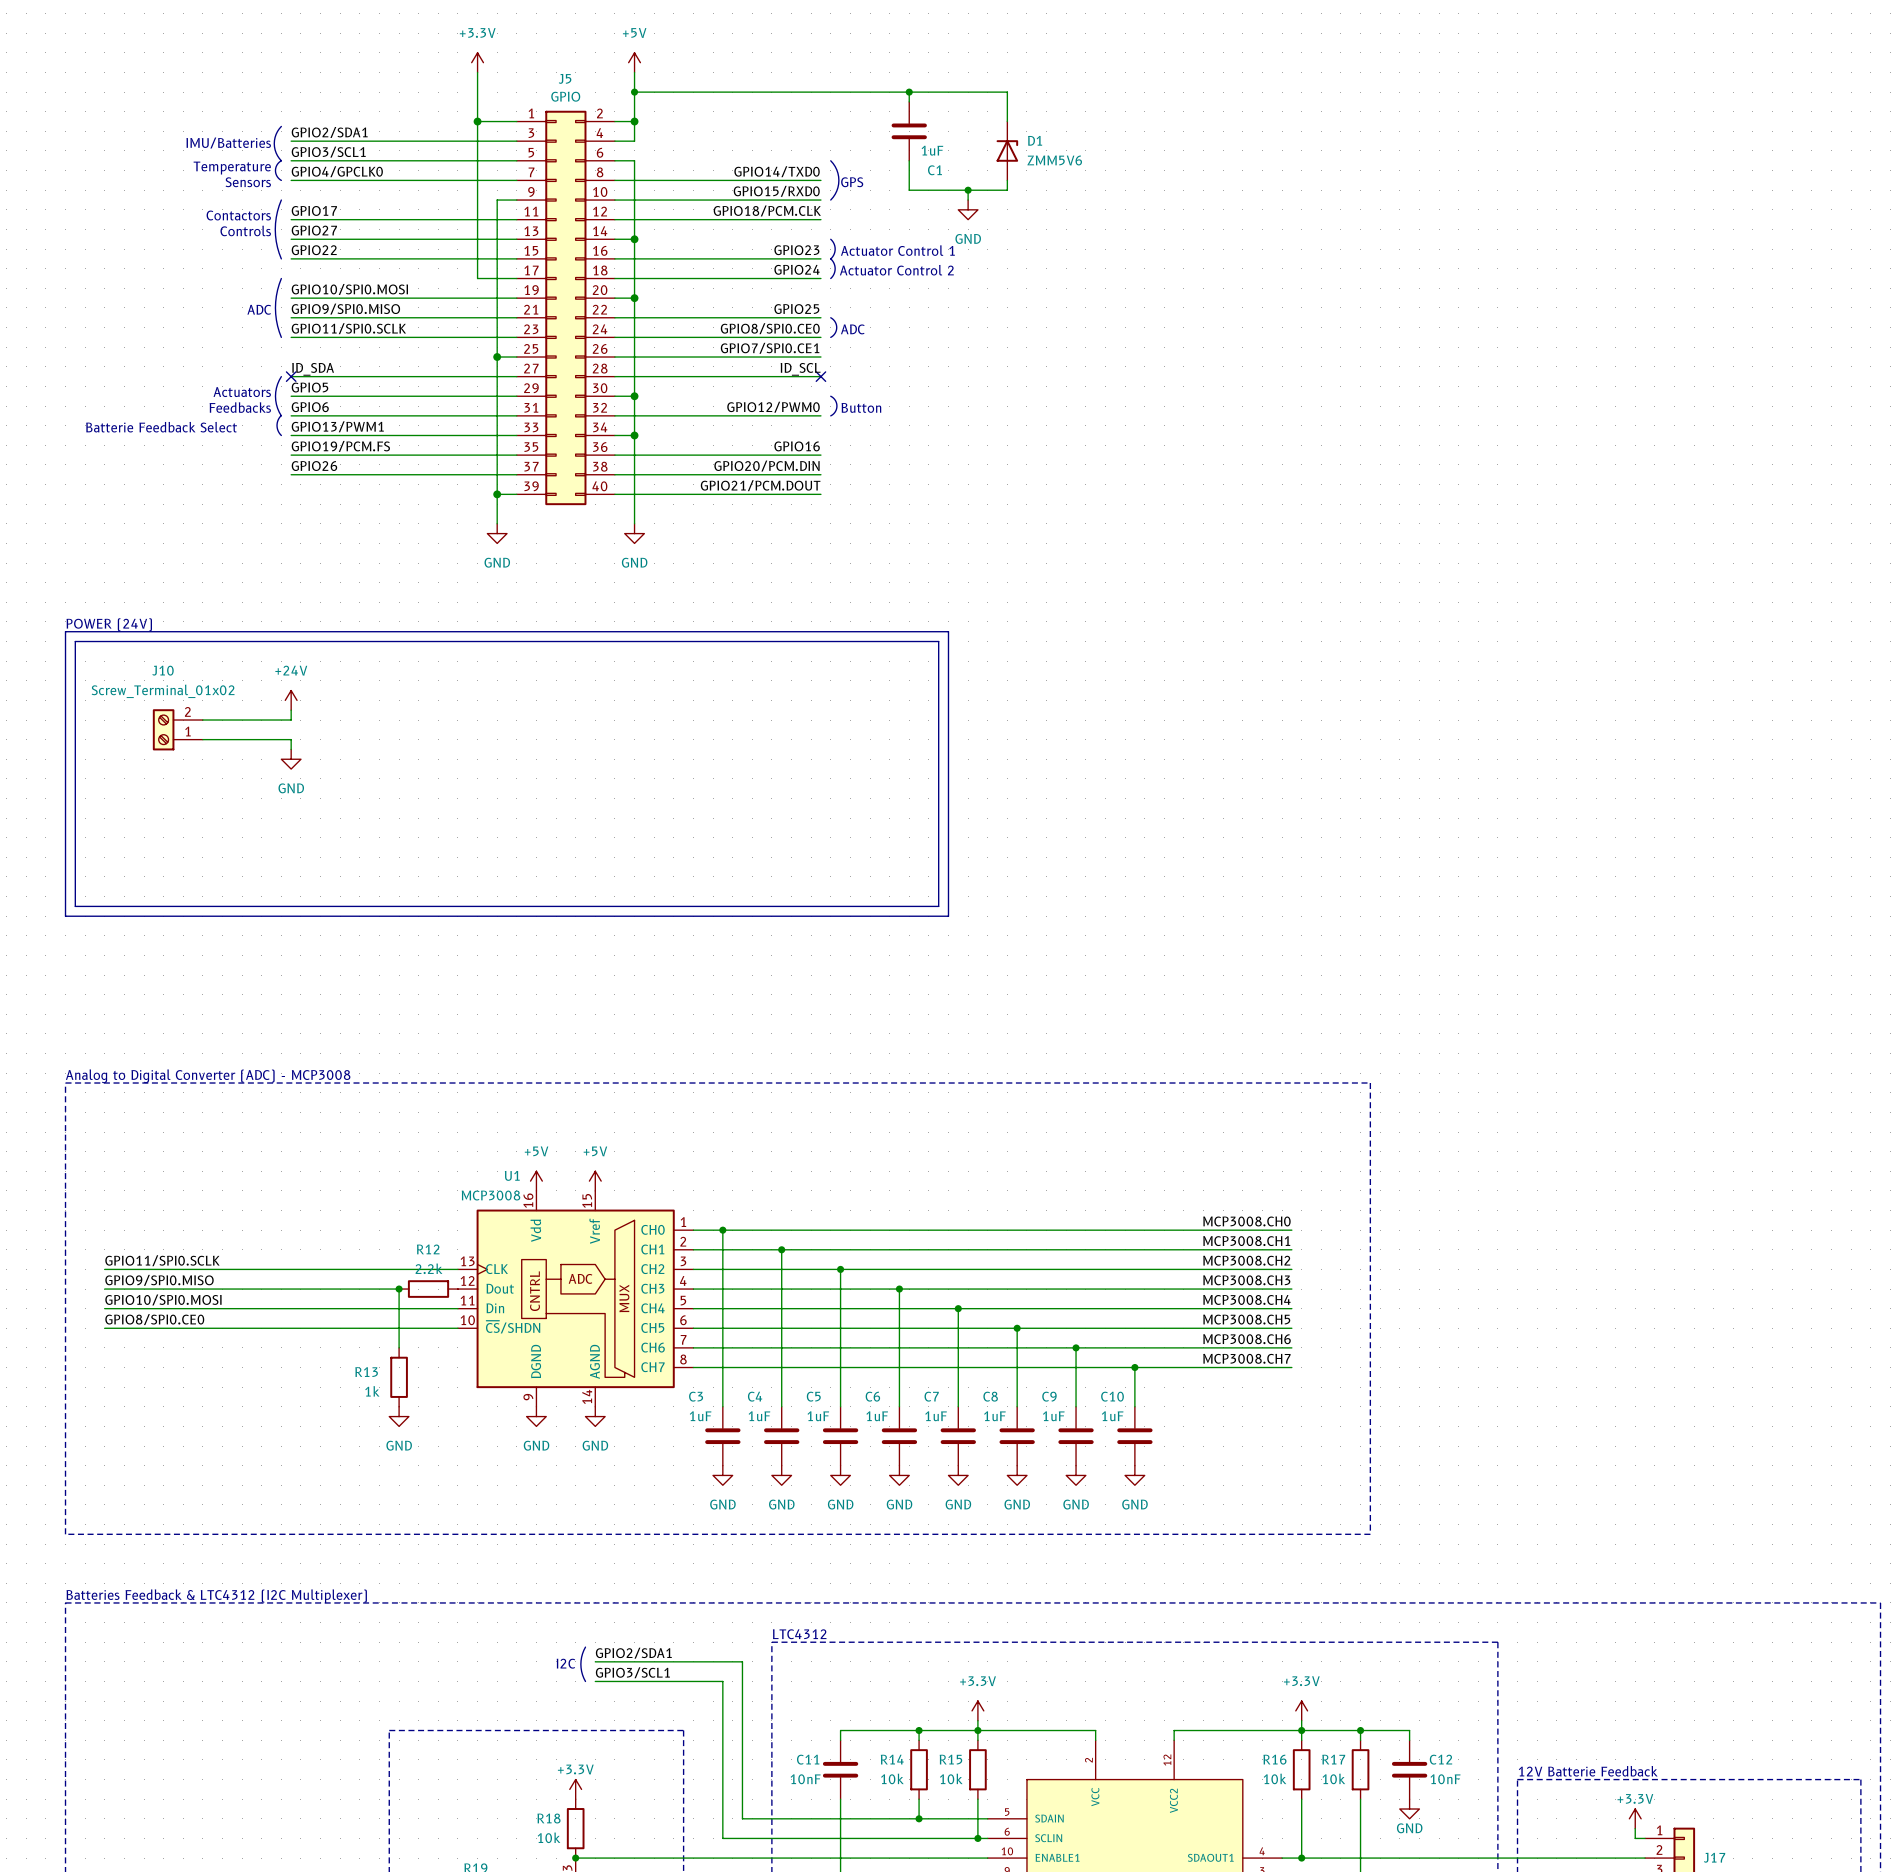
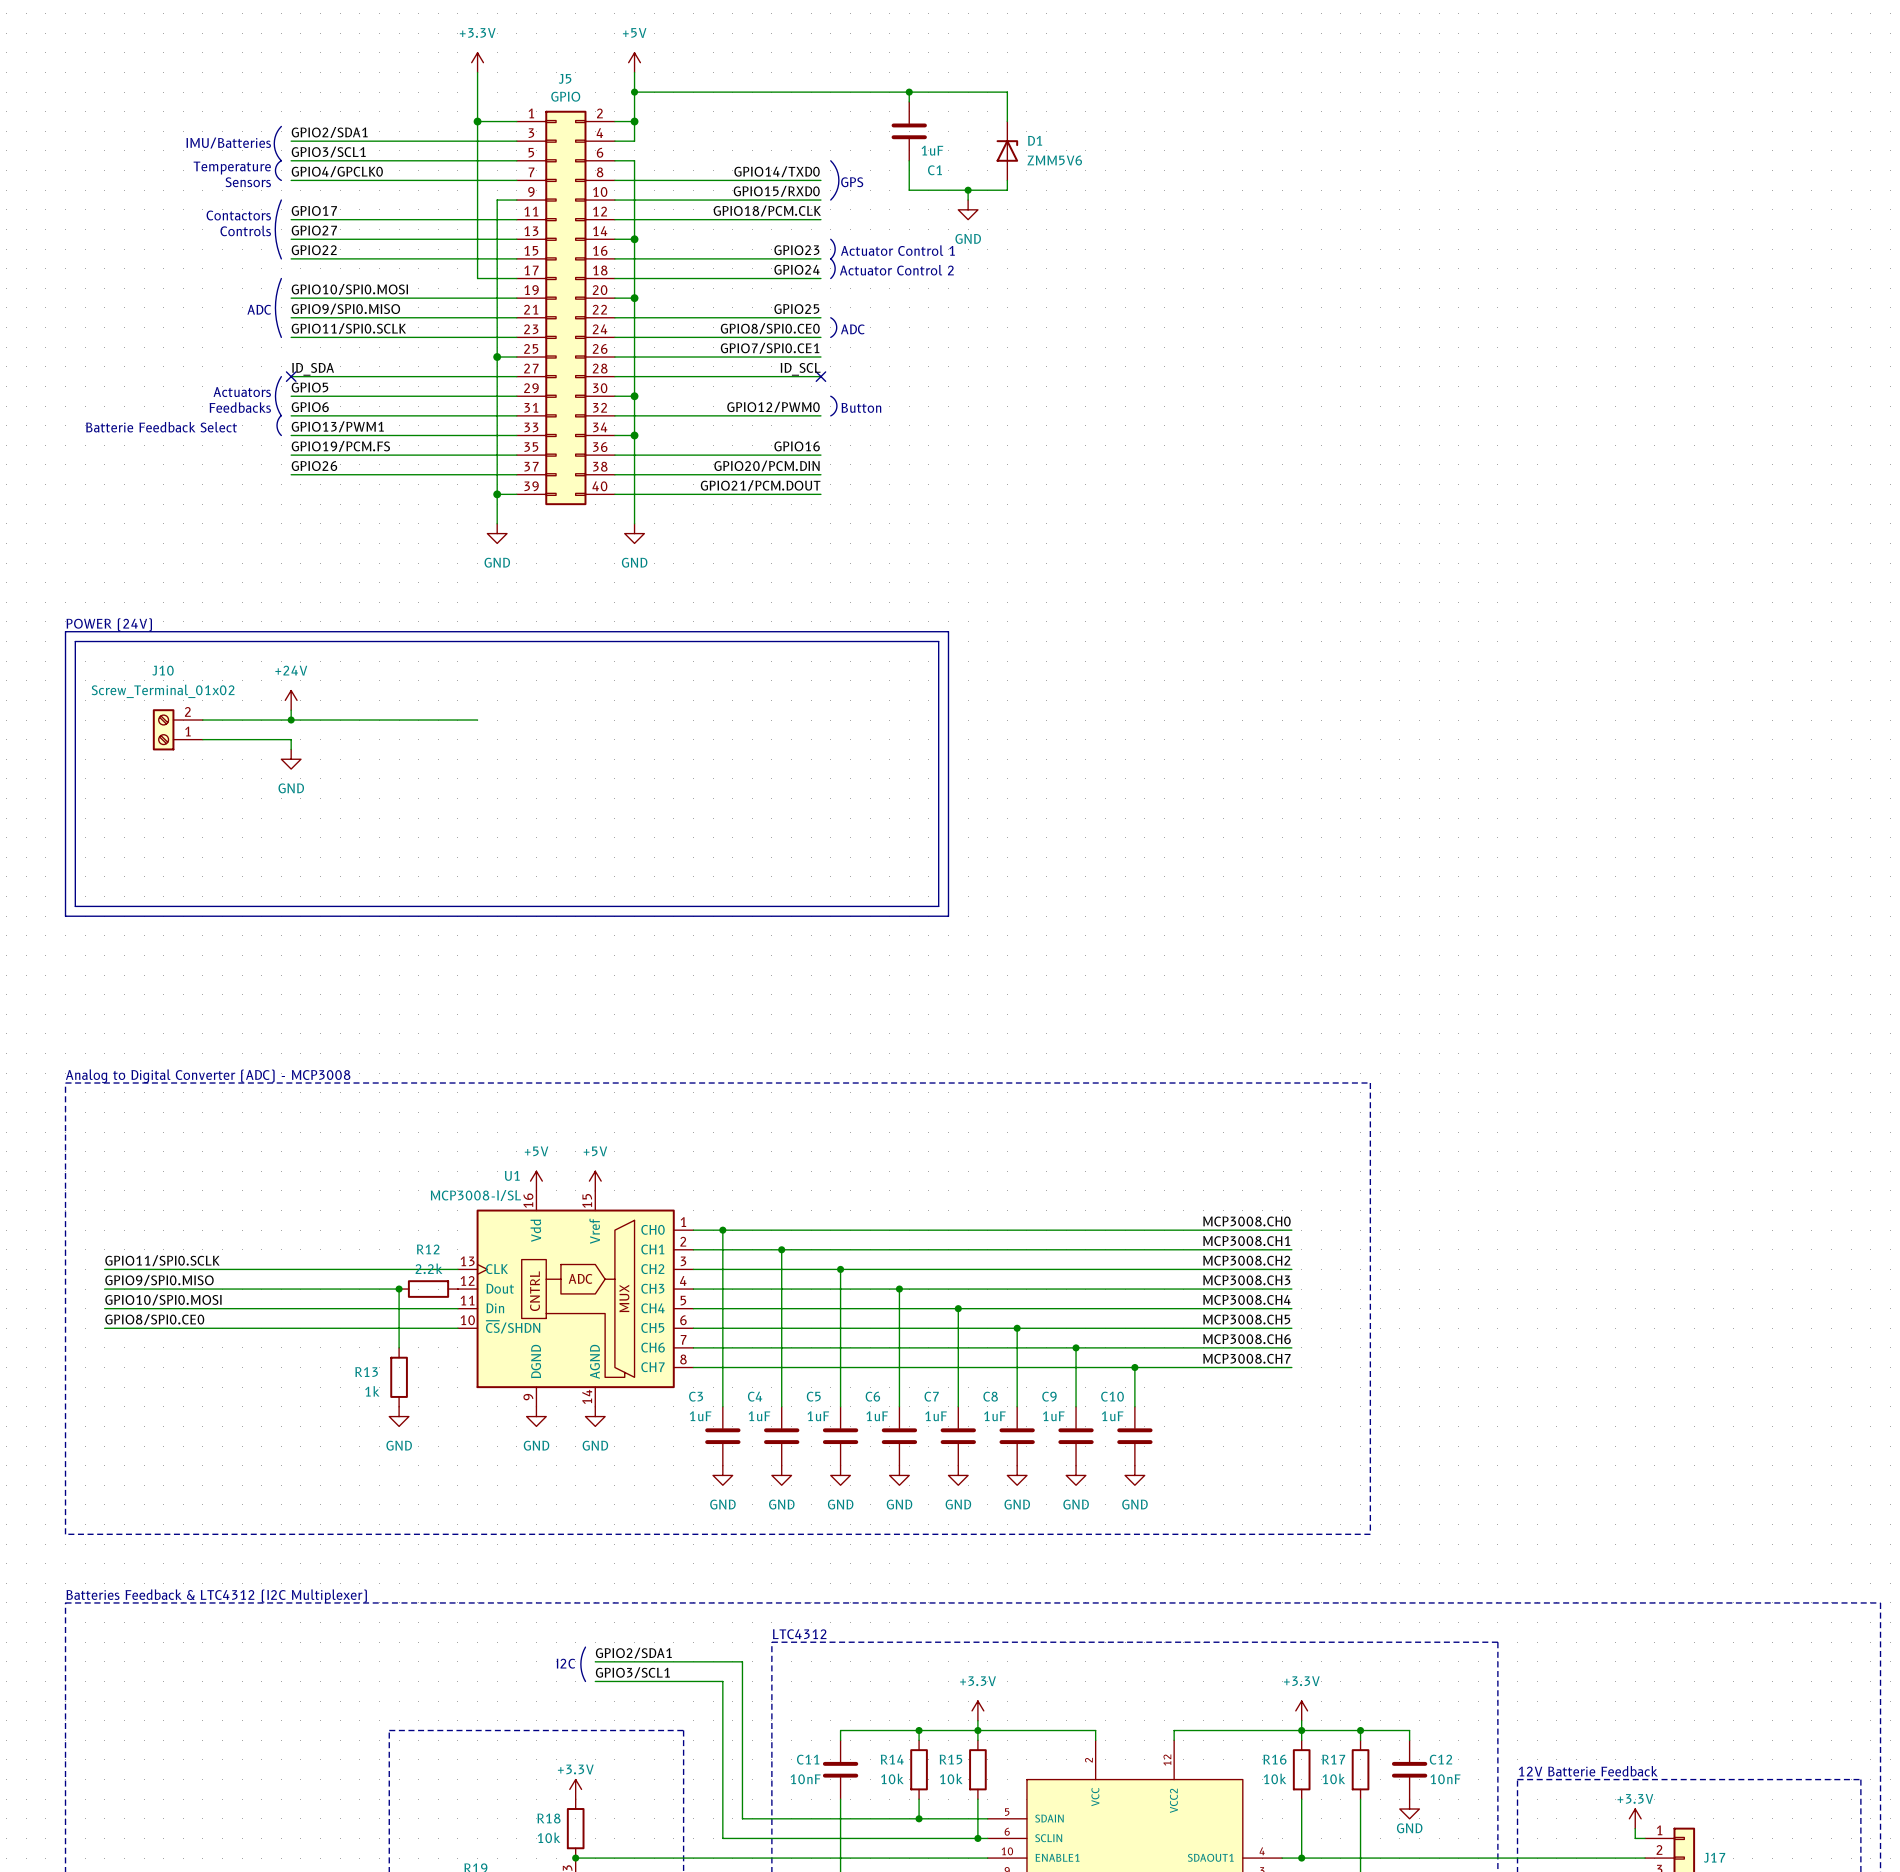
wire: none -> (291, 720) (477, 720)
junction: none -> (291, 720)
U1 value: MCP3008 (491, 1195) -> MCP3008-I/SL (475, 1195)

